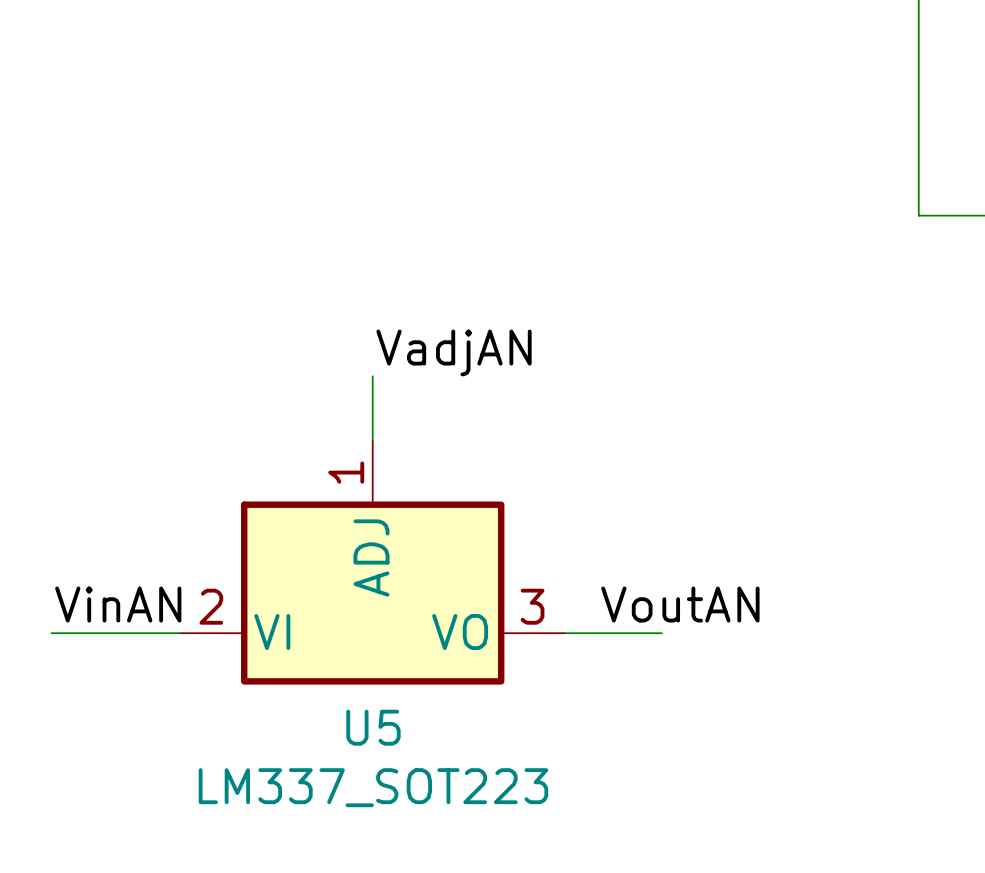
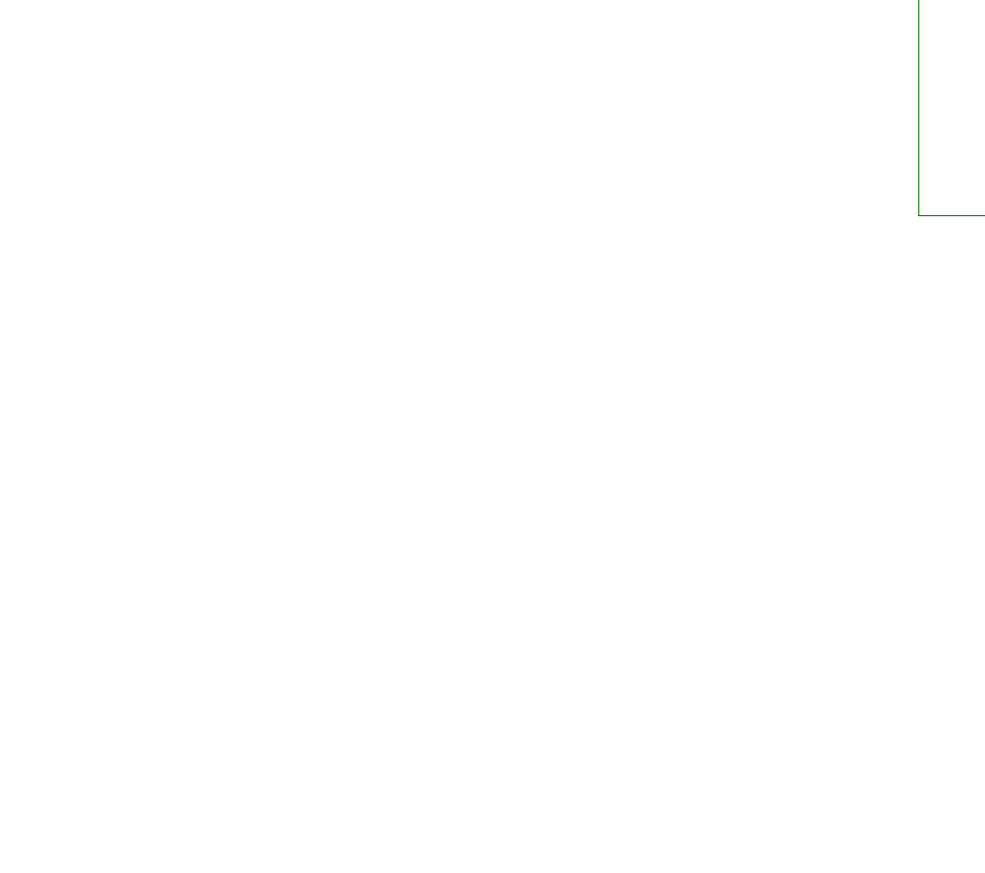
label: VadjAN (454, 352) -> none
wire: (372, 376) (372, 440) -> none
U5: LM337_SOT223 (372, 562) -> none
label: VinAN (118, 604) -> none
label: VoutAN (680, 604) -> none
wire: (51, 633) (179, 633) -> none
wire: (565, 633) (661, 633) -> none

